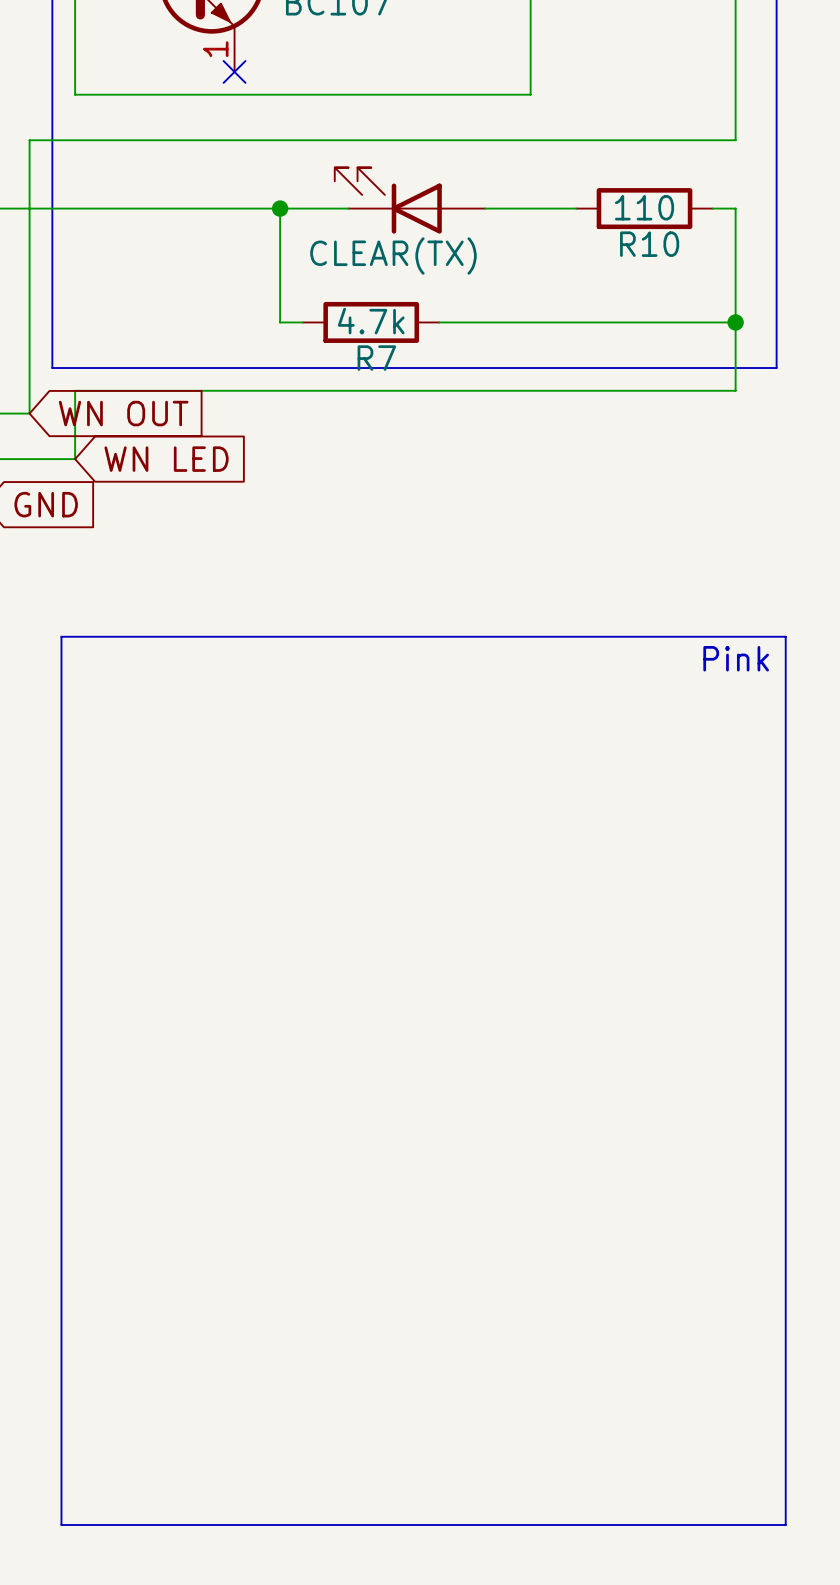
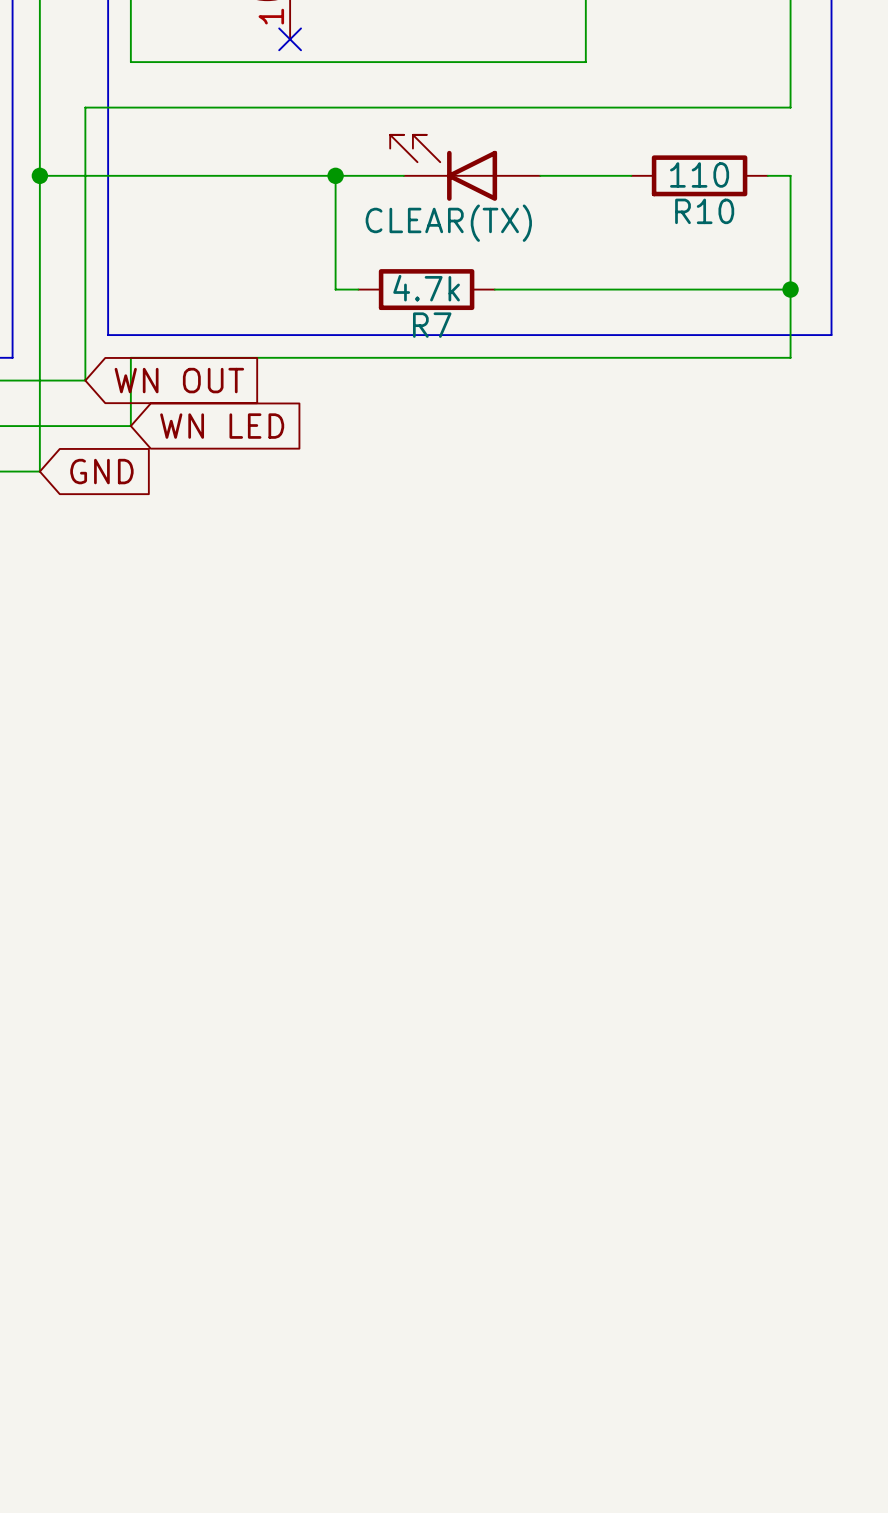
line: (61, 636) (785, 636) (785, 1524) (61, 1524) (61, 636) -> none
text: Pink (736, 658) -> none

